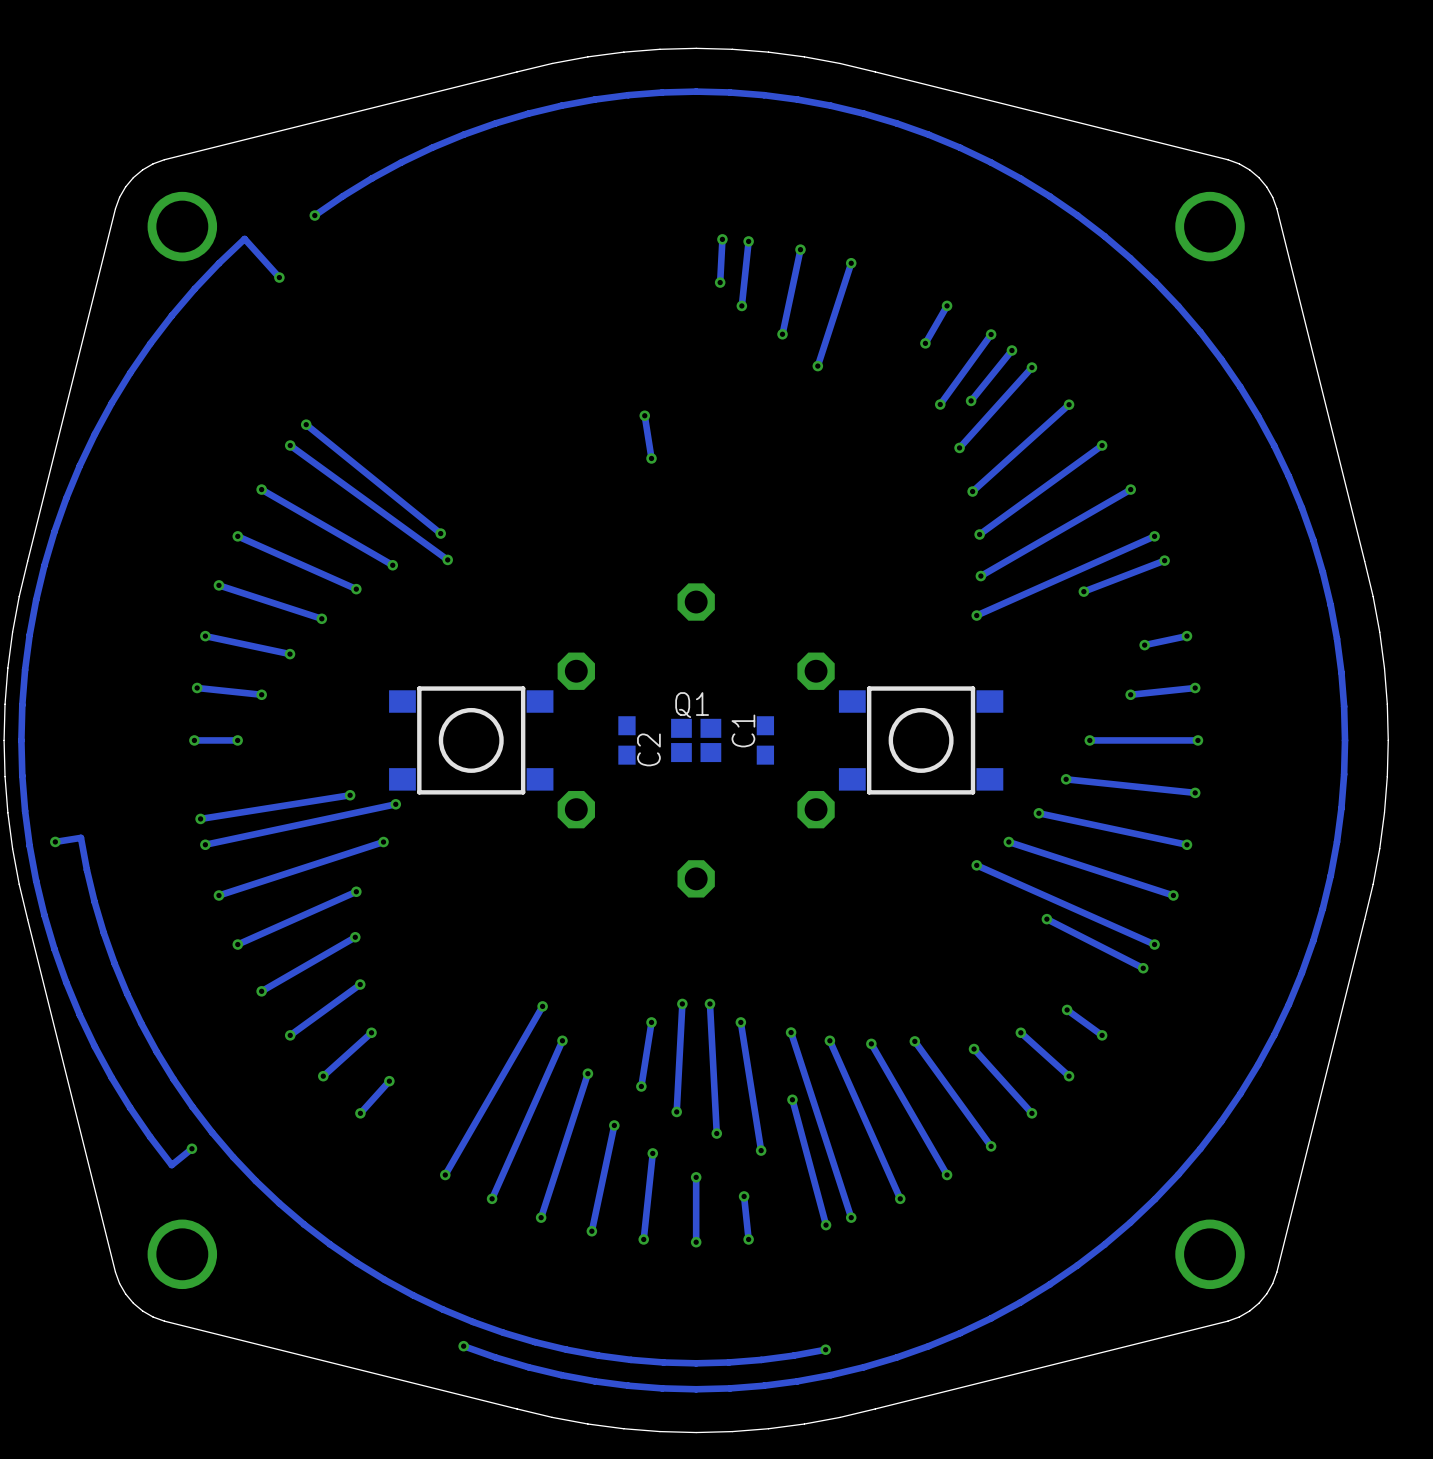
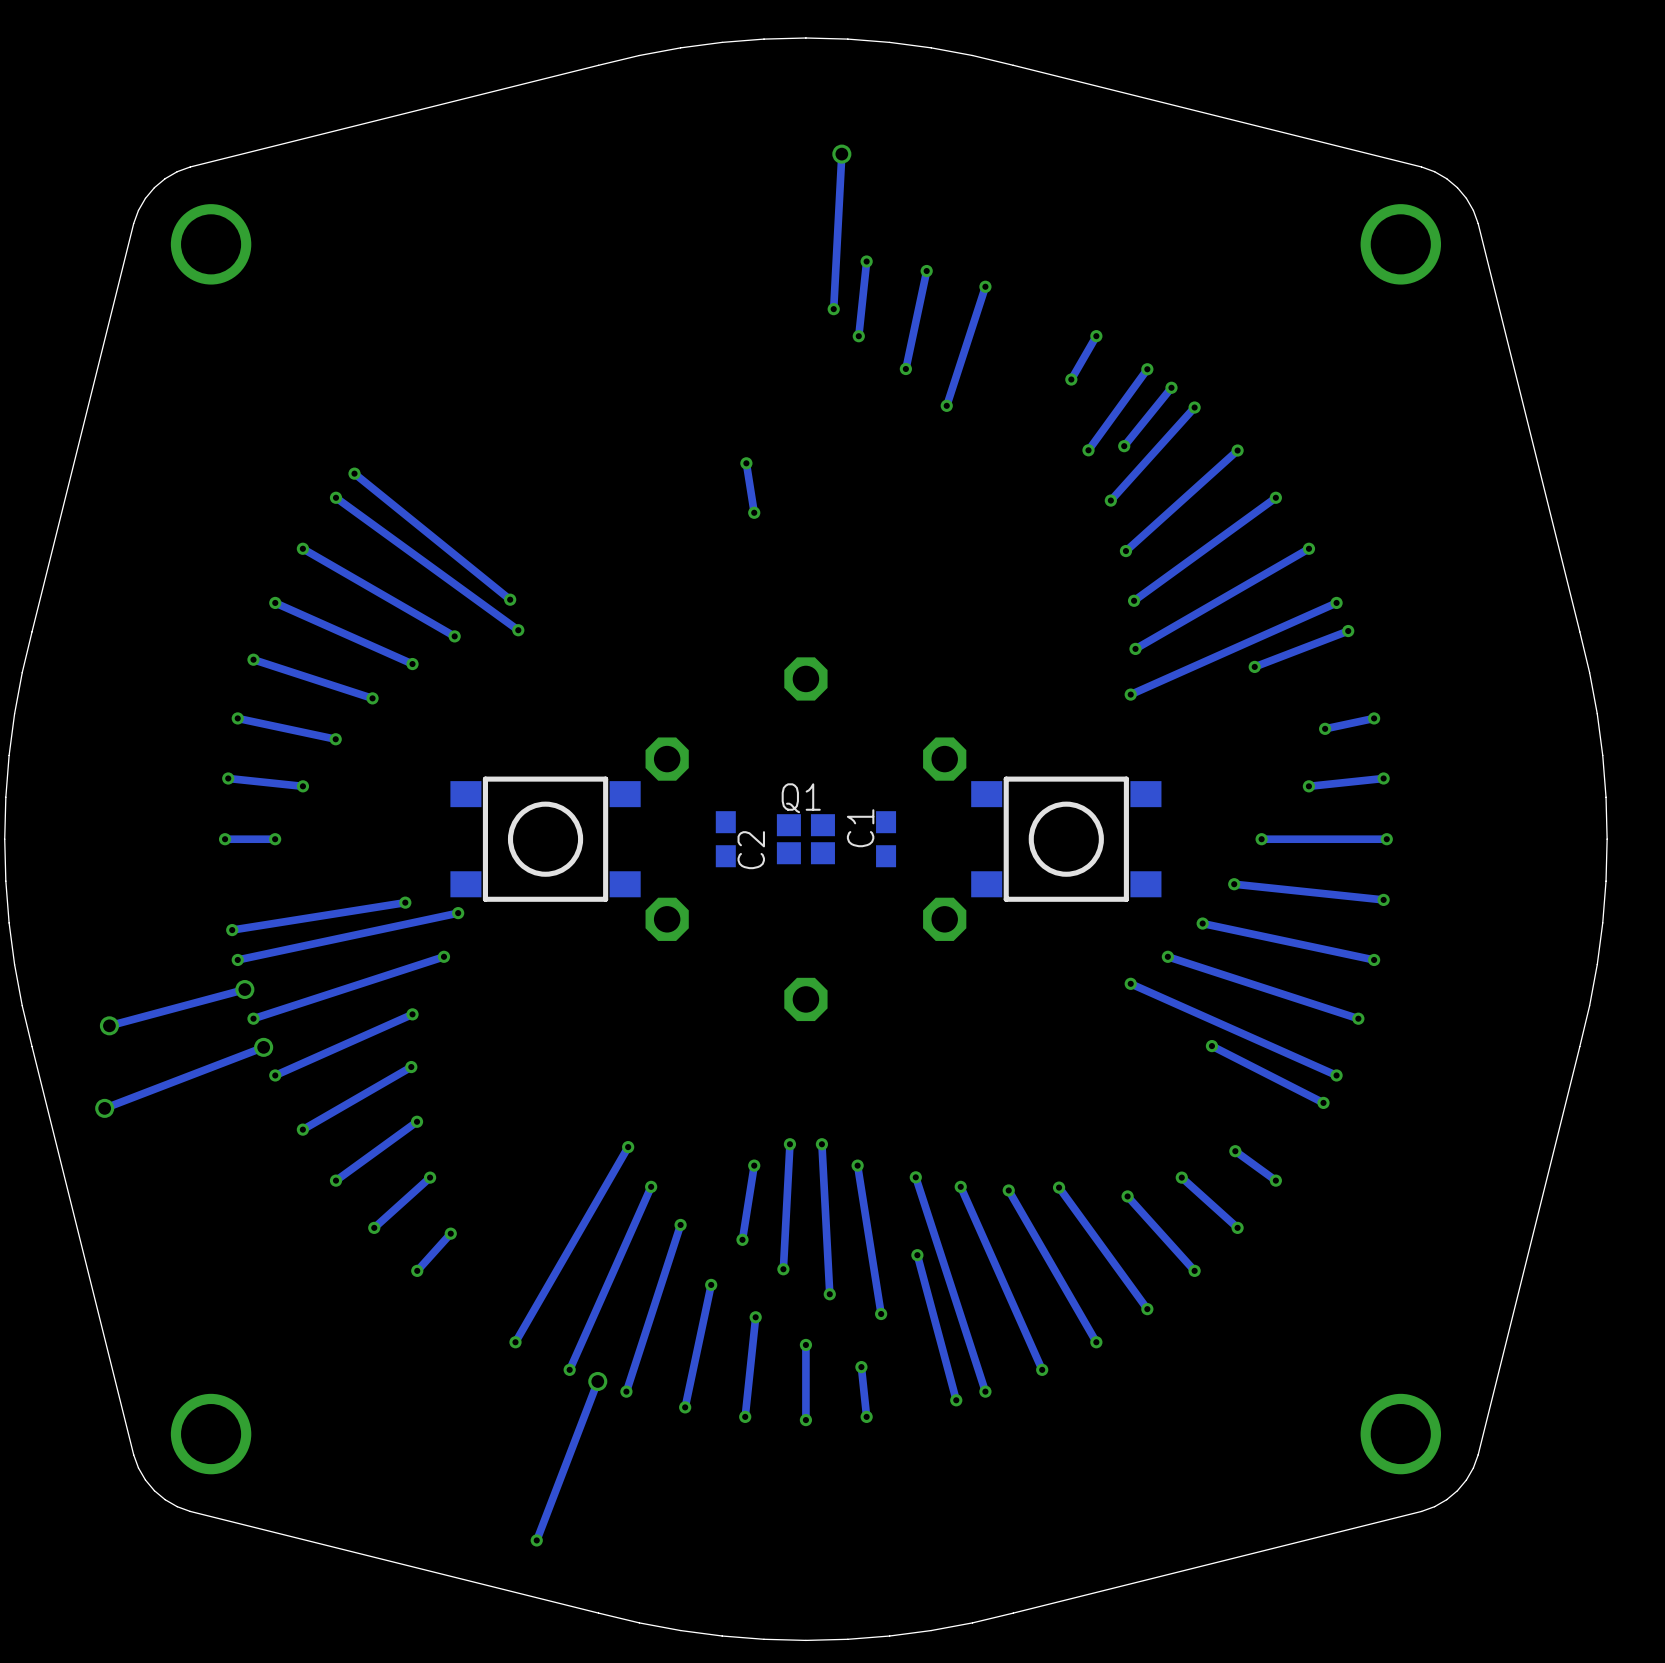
track: none -> (841, 154) (836, 259)
via: none -> (841, 154)
track: (314, 215) (371, 178) (432, 147) (463, 134) (528, 113) (594, 99) (628, 95) (696, 91) (764, 95) (797, 99) (864, 113) (928, 134) (960, 147) (1020, 178) (1049, 196) (1104, 236) (1130, 258) (1178, 306) (1221, 359) (1258, 416) (1288, 476) (1301, 507) (1322, 572) (1337, 638) (1341, 672) (1345, 740) (1341, 808) (1337, 841) (1322, 908) (1301, 972) (1288, 1004) (1258, 1064) (1221, 1121) (1178, 1174) (1130, 1222) (1104, 1244) (1049, 1284) (1020, 1302) (960, 1333) (928, 1346) (864, 1367) (797, 1381) (764, 1385) (696, 1389) (628, 1385) (594, 1381) (528, 1367) (463, 1346) -> (597, 1381) (536, 1540)
via: (314, 215) -> none
via: (722, 239) -> none
track: (279, 277) (244, 238) (219, 263) (171, 315) (130, 372) (94, 434) (66, 498) (44, 565) (36, 600) (25, 669) (21, 740) (25, 810) (36, 880) (54, 948) (66, 982) (94, 1046) (130, 1107) (150, 1137) (171, 1165) (191, 1148) -> none
via: (279, 277) -> none
track: (55, 841) (80, 837) (94, 901) (114, 963) (127, 993) (156, 1051) (192, 1106) (233, 1157) (279, 1203) (330, 1244) (356, 1262) (413, 1295) (472, 1321) (534, 1342) (598, 1355) (663, 1362) (696, 1363) (761, 1359) (825, 1349) -> none
via: (55, 841) -> none
track: none -> (244, 989) (109, 1025)
via: none -> (244, 989)
via: none -> (109, 1025)
track: none -> (263, 1047) (104, 1108)
via: none -> (263, 1047)
via: none -> (104, 1108)
via: (191, 1148) -> none
via: none -> (597, 1381)
via: (825, 1349) -> none

